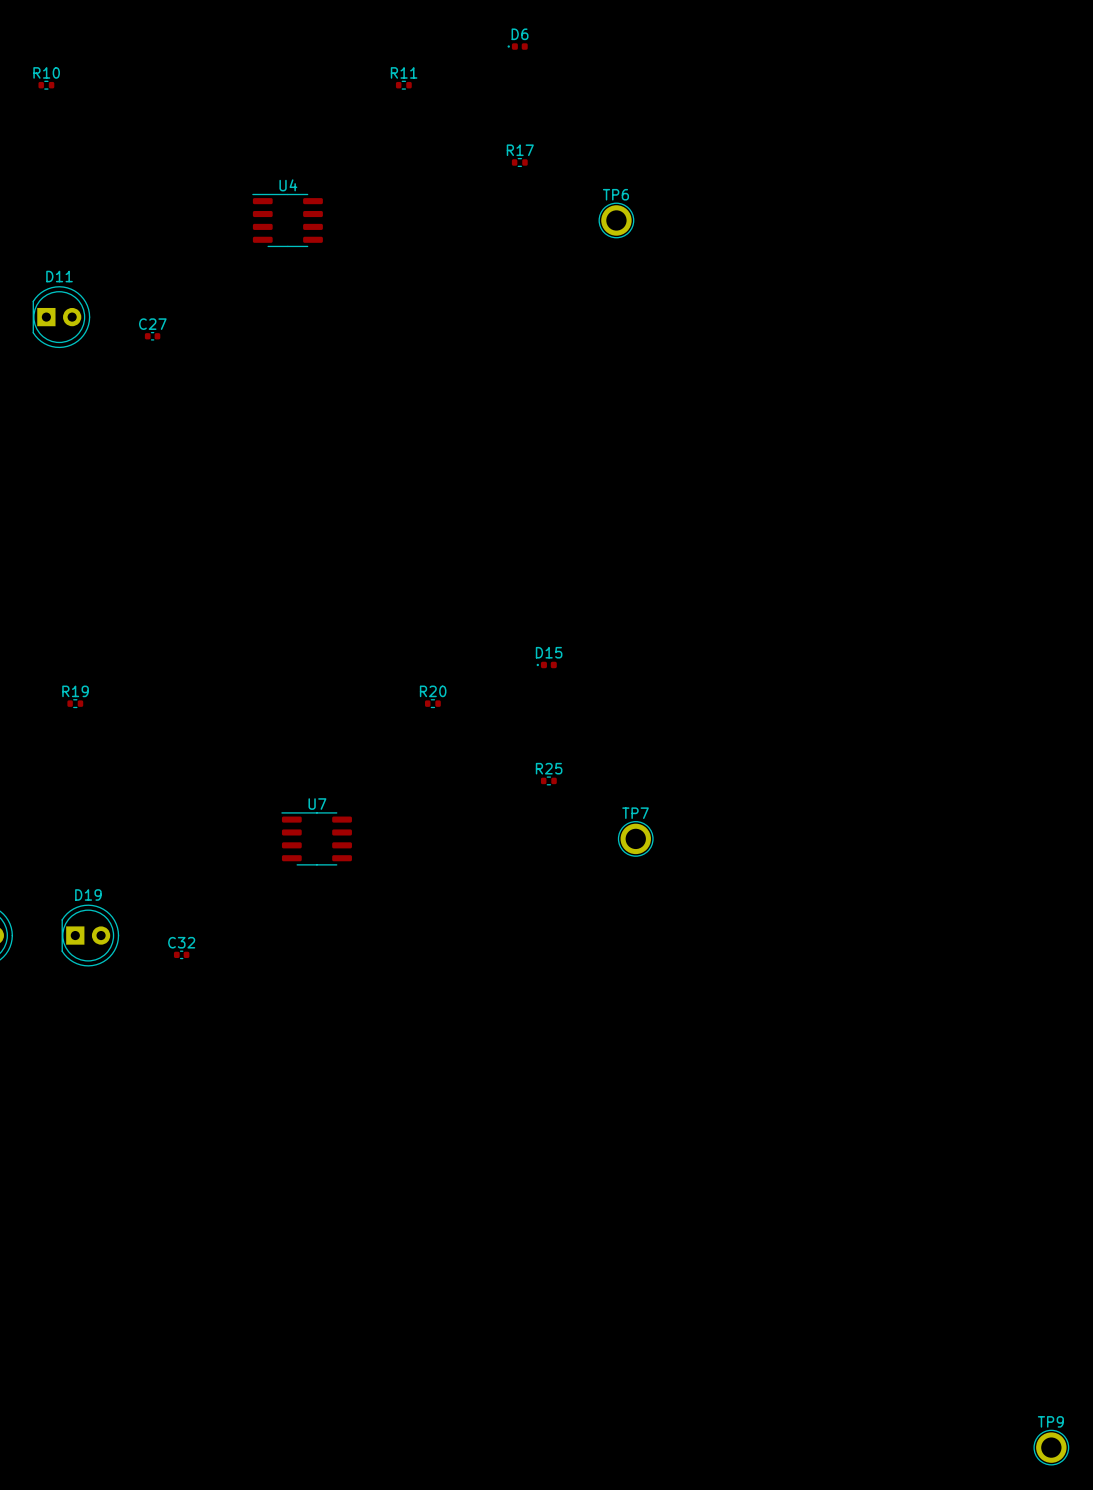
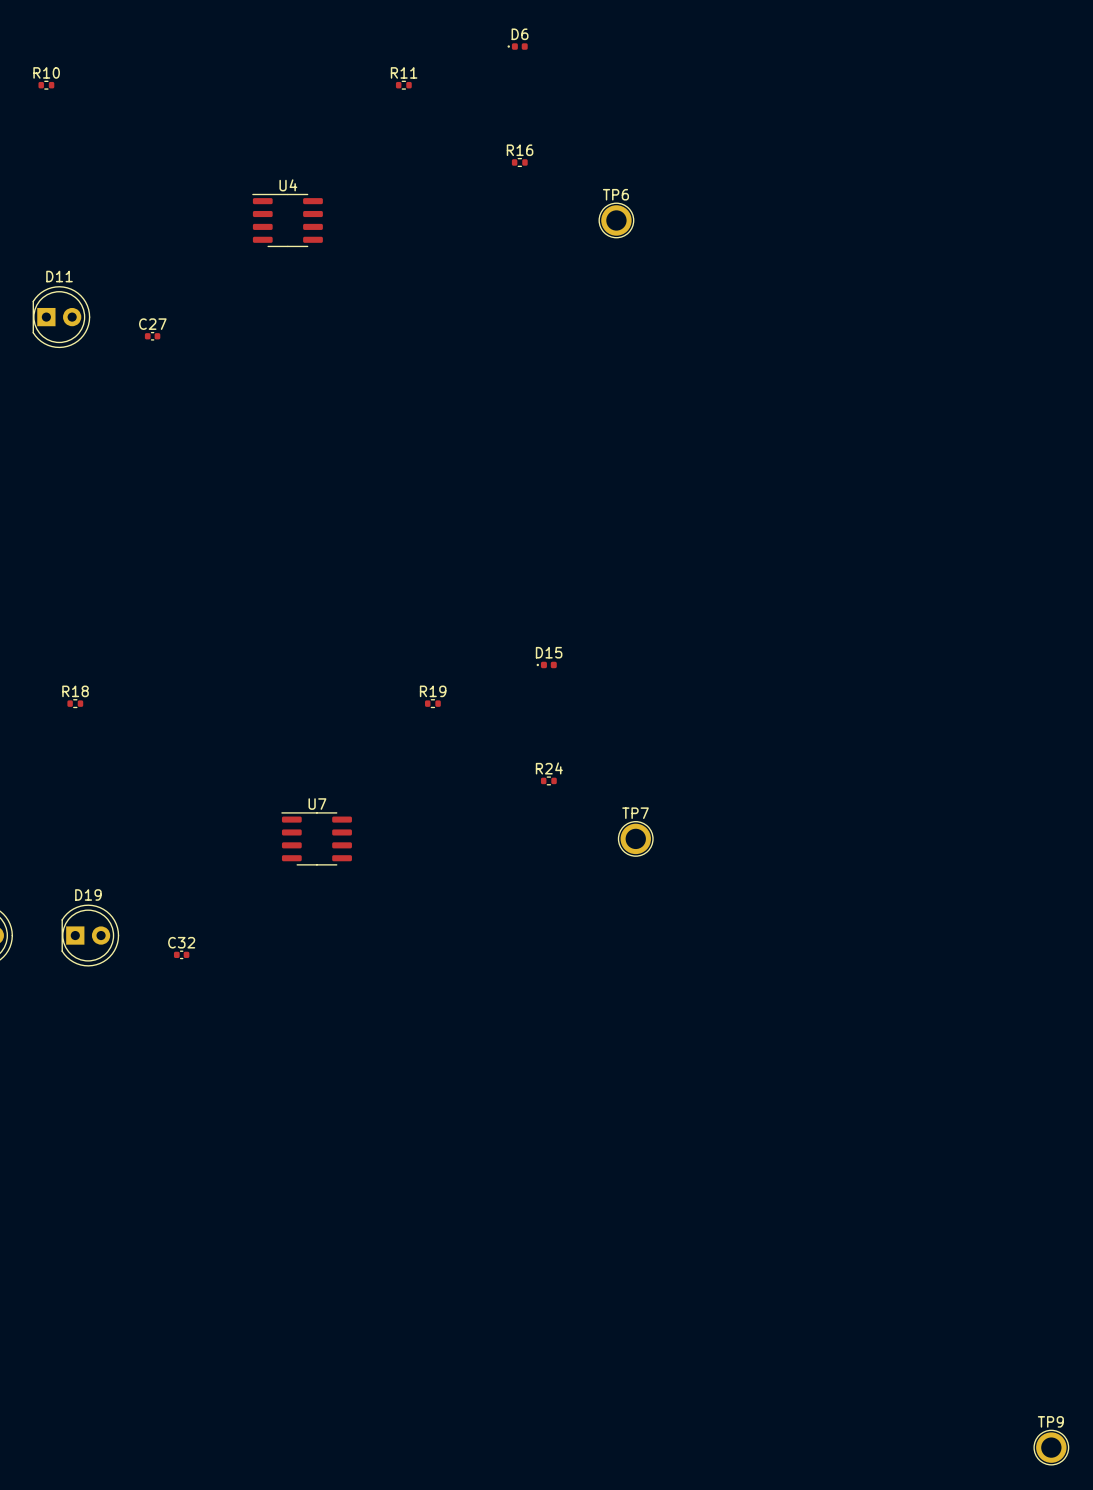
R17 name: R17 (520, 150) -> R16 (520, 150)
R19 name: R19 (75, 691) -> R18 (75, 691)
R20 name: R20 (433, 691) -> R19 (433, 691)
R25 name: R25 (549, 768) -> R24 (549, 768)

